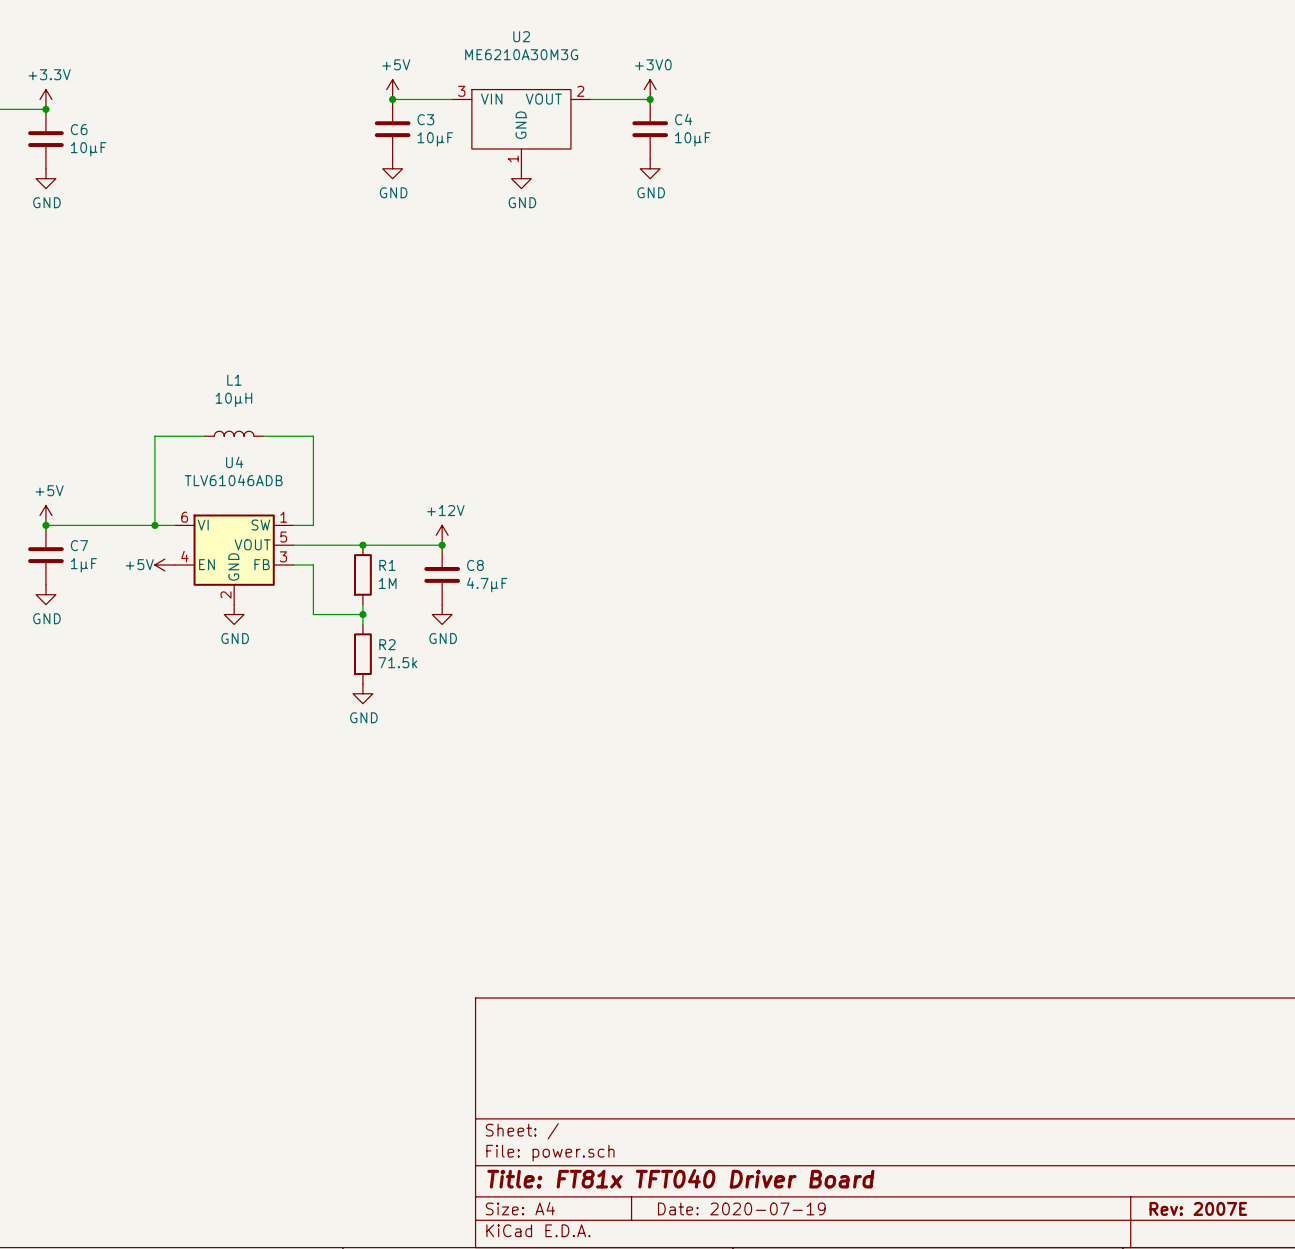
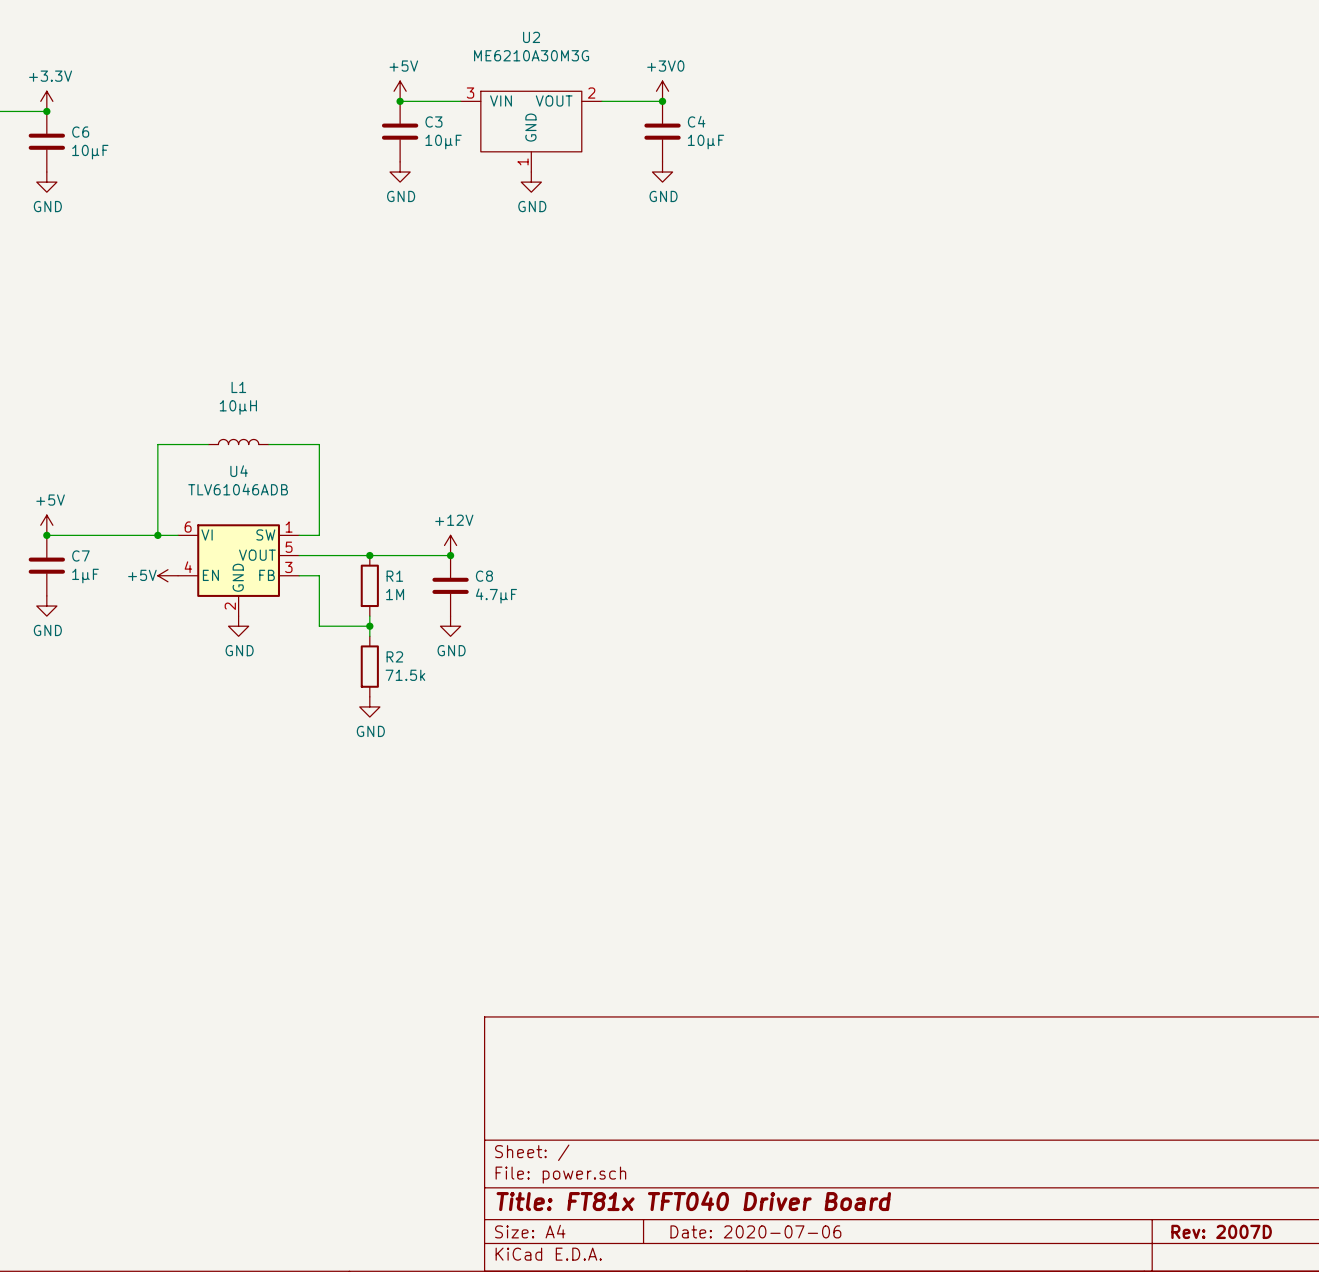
title block: Date: 2020-07-19 (741, 1208) -> Date: 2020-07-06 (755, 1231)
title block: Rev: 2007E (1198, 1208) -> Rev: 2007D (1221, 1231)

